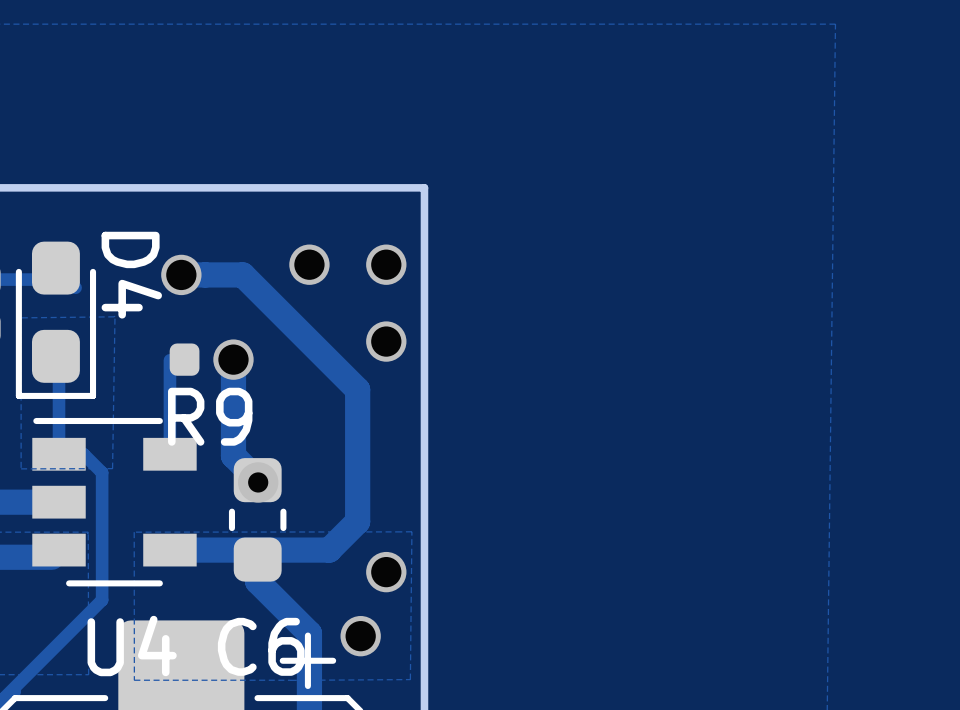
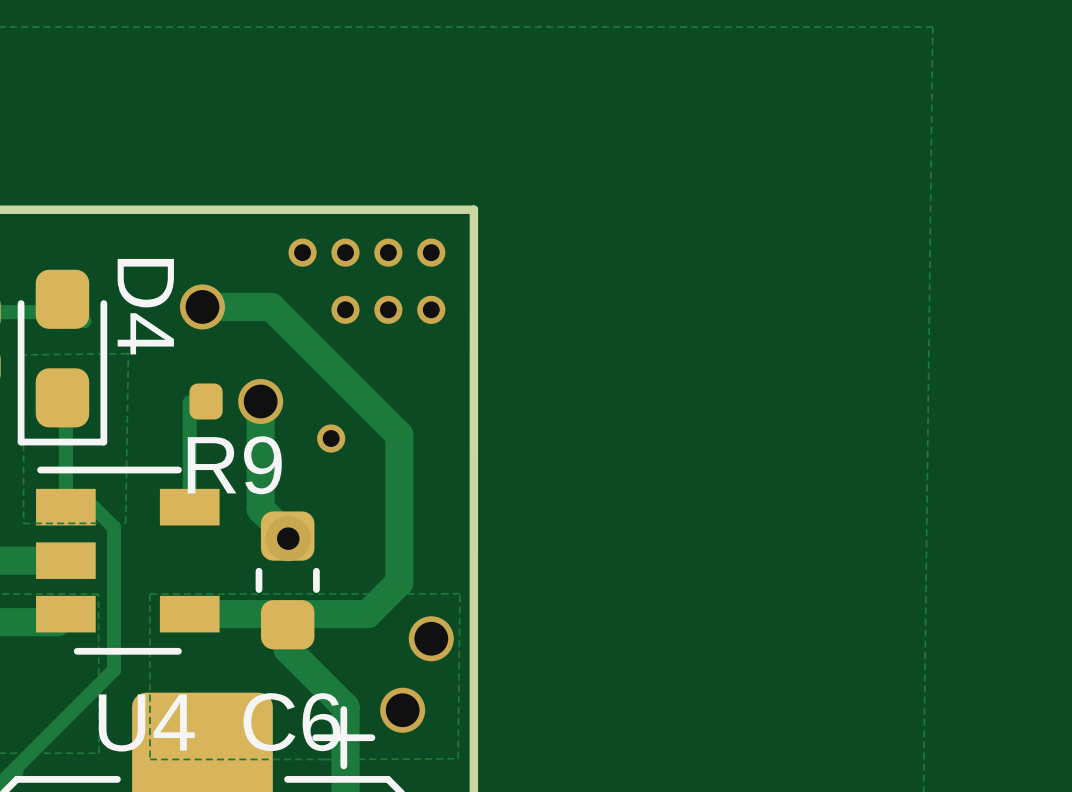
via: none -> (302, 252)
via: none -> (345, 252)
via: none -> (388, 252)
via: none -> (431, 252)
via size: [289, 244, 330, 285] -> [331, 295, 360, 324]
via size: [366, 244, 407, 285] -> [417, 295, 446, 324]
via: none -> (388, 309)
via: (386, 341) -> none
via: none -> (331, 438)

